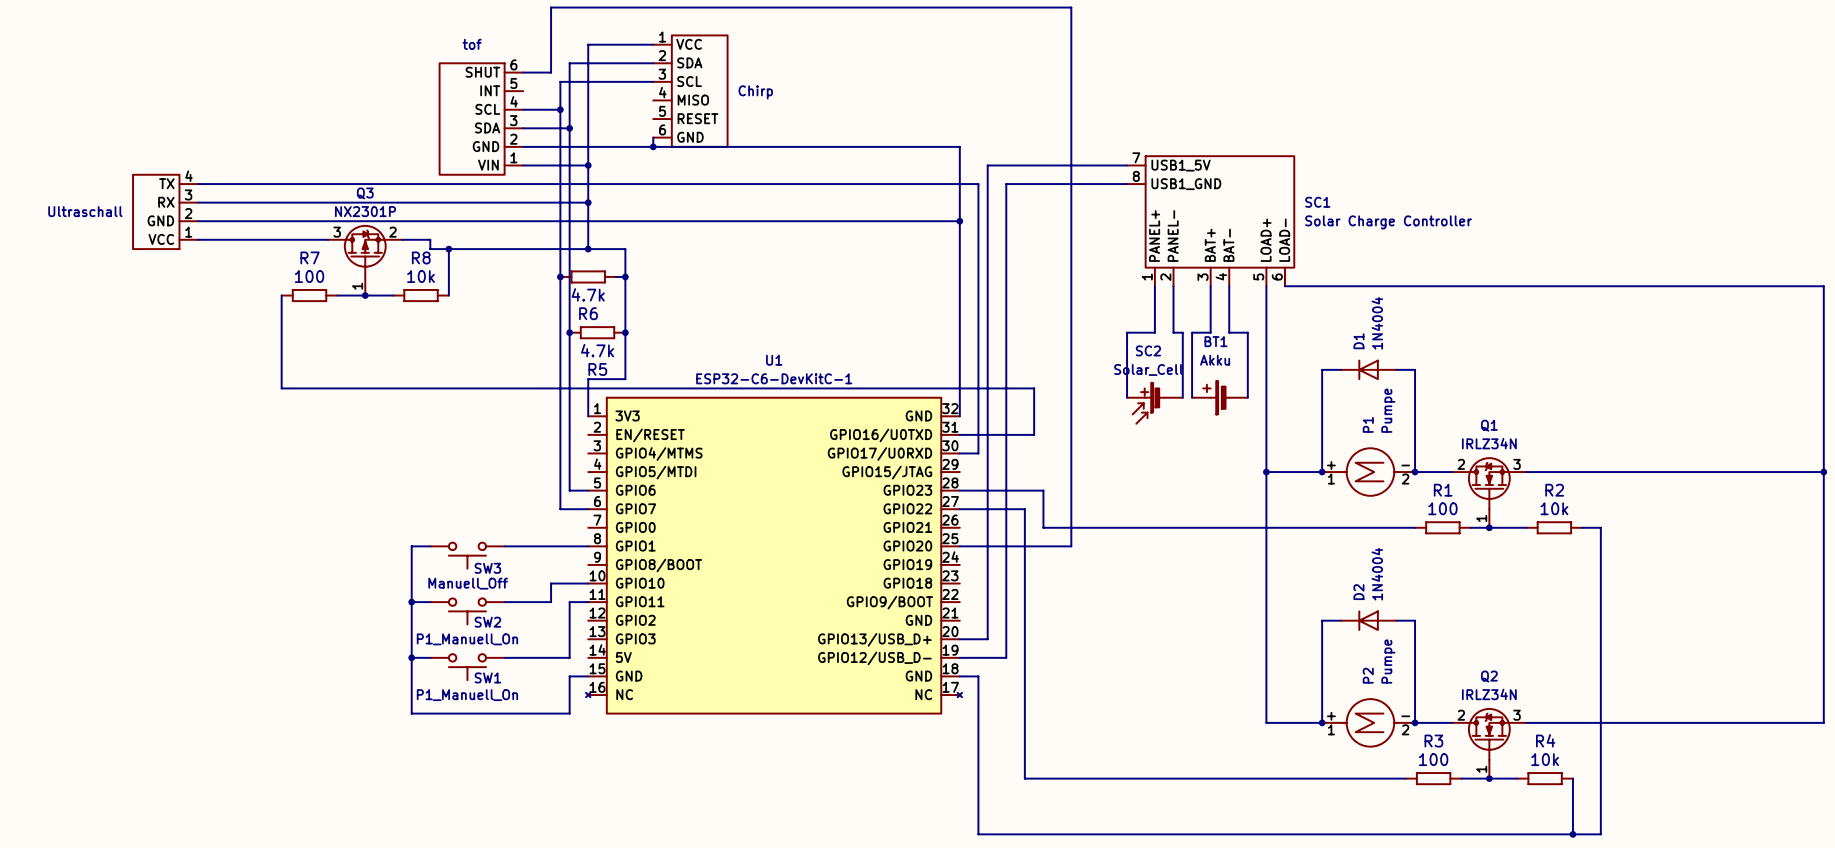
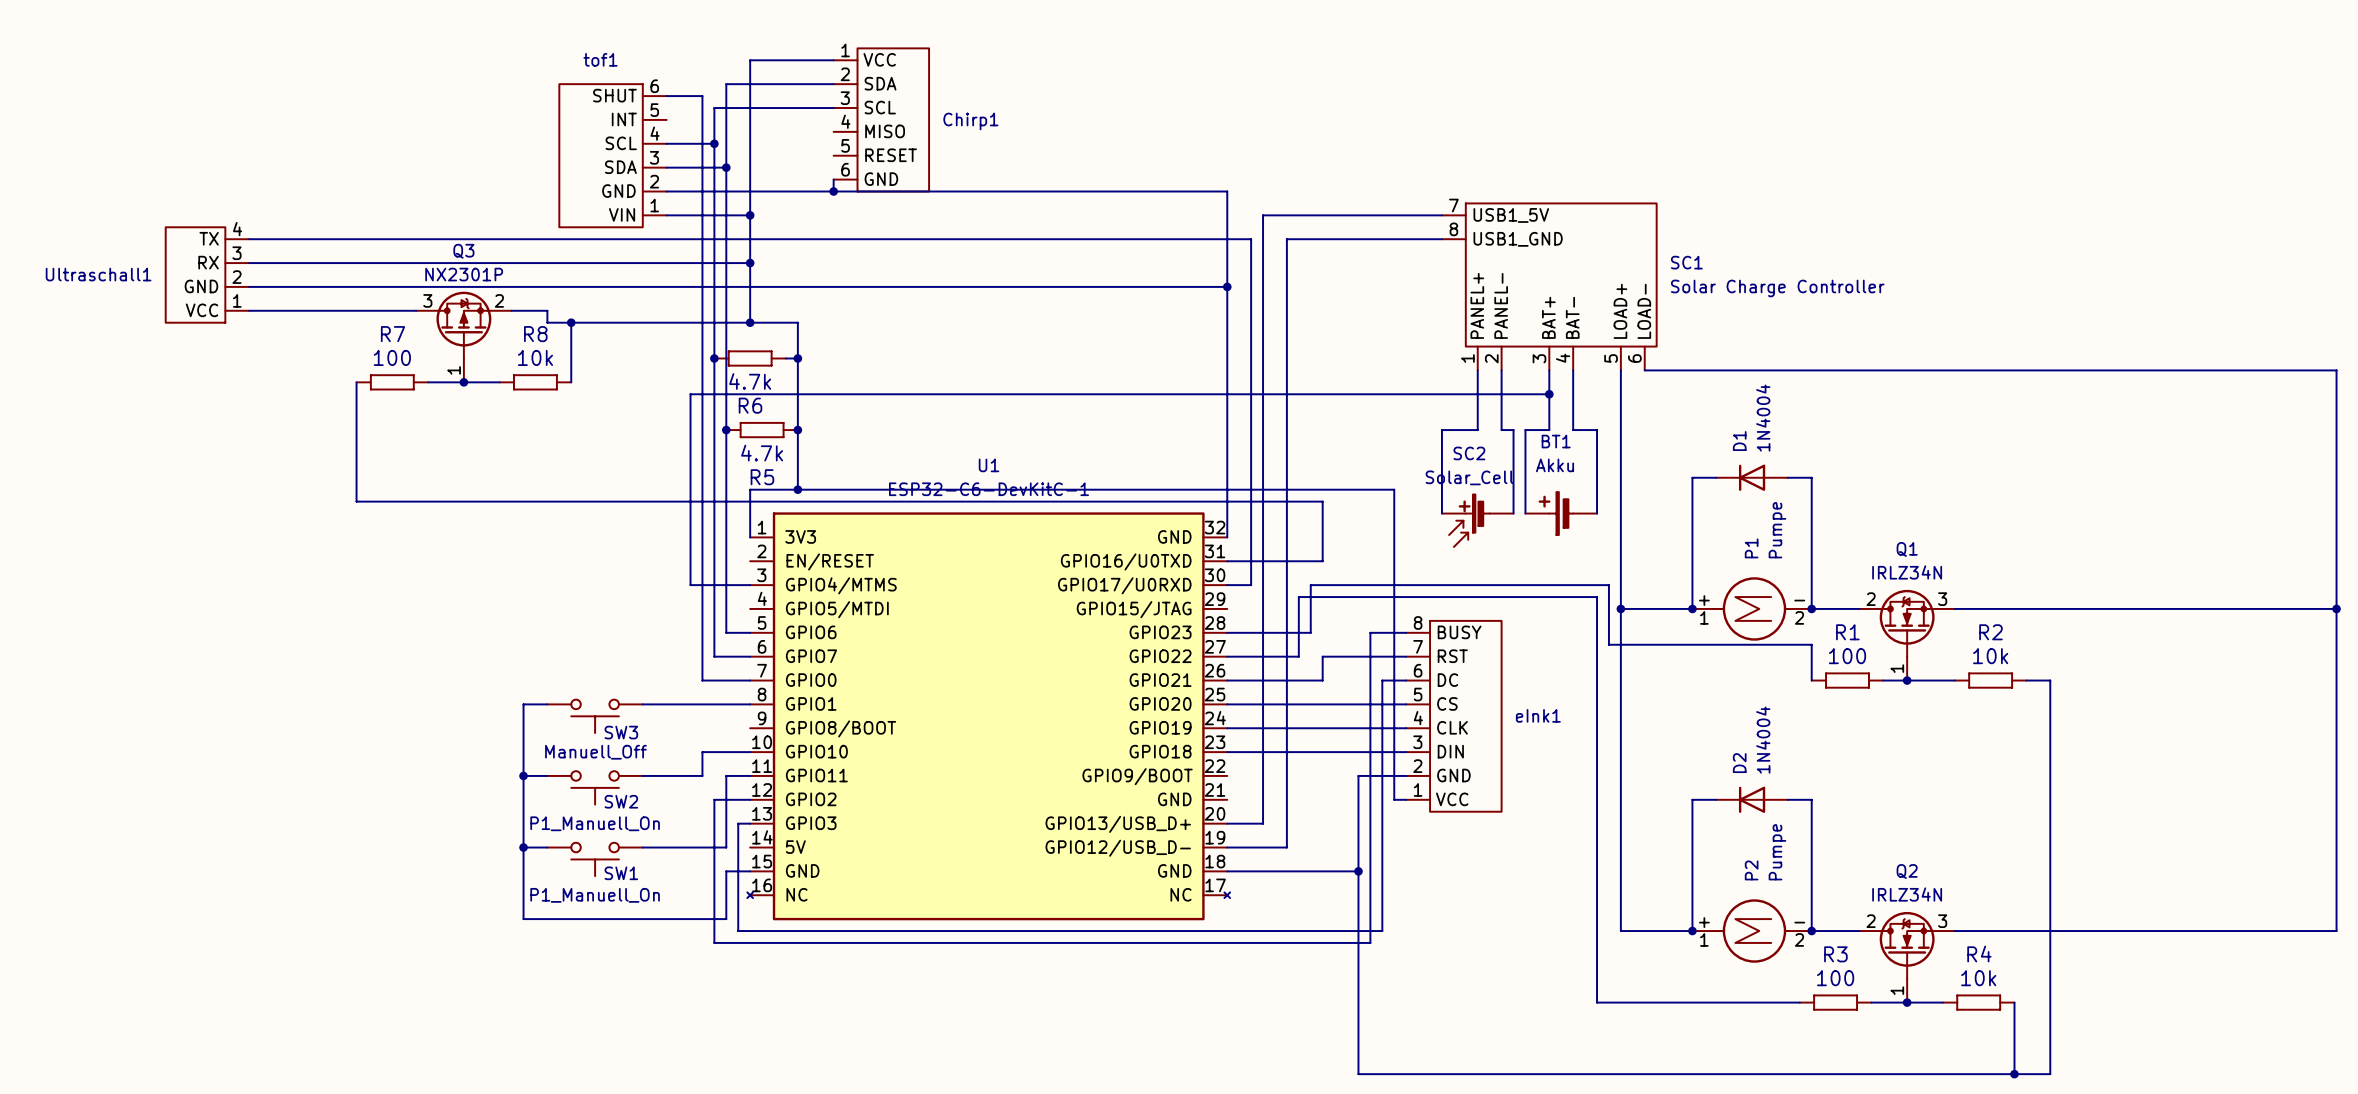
tof name: tof (472, 44) -> tof1 (600, 59)
wire: (551, 72) (551, 7) (1071, 7) (1071, 490) -> (702, 96) (702, 680) (750, 680)
Chirp name: Chirp (755, 92) -> Chirp1 (970, 121)
Ultraschall name: Ultraschall (85, 211) -> Ultraschall1 (98, 274)
wire: none -> (1549, 394) (690, 394) (690, 585) (750, 585)
junction: none -> (1549, 394)
wire: none -> (797, 489) (1394, 489) (1394, 799) (1406, 799)
junction: none -> (797, 489)
wire: (1024, 490) (1043, 490) (1043, 527) (1080, 527) -> (750, 823) (738, 823) (738, 931) (1382, 931) (1382, 680)
wire: none -> (1370, 632) (1406, 632)
wire: (1015, 509) (1024, 509) (1024, 778) (1247, 778) -> (1298, 656) (1298, 597) (1597, 597) (1597, 1002)
wire: none -> (1406, 656) (1322, 656) (1322, 680) (1227, 680)
wire: (1099, 527) (1415, 527) -> (1310, 632) (1310, 585) (1608, 585) (1608, 644) (1811, 644) (1811, 680)
wire: none -> (1406, 704) (1370, 704) (1370, 942) (714, 942) (714, 799) (750, 799)
eInk1: none -> (1453, 716)
wire: none -> (1227, 728) (1406, 728)
wire: none -> (1227, 752) (1406, 752)
wire: (978, 676) (978, 834) (1062, 834) -> (1406, 775) (1358, 775) (1358, 1074)
wire: none -> (1251, 871) (1358, 871)
junction: none -> (1358, 871)

